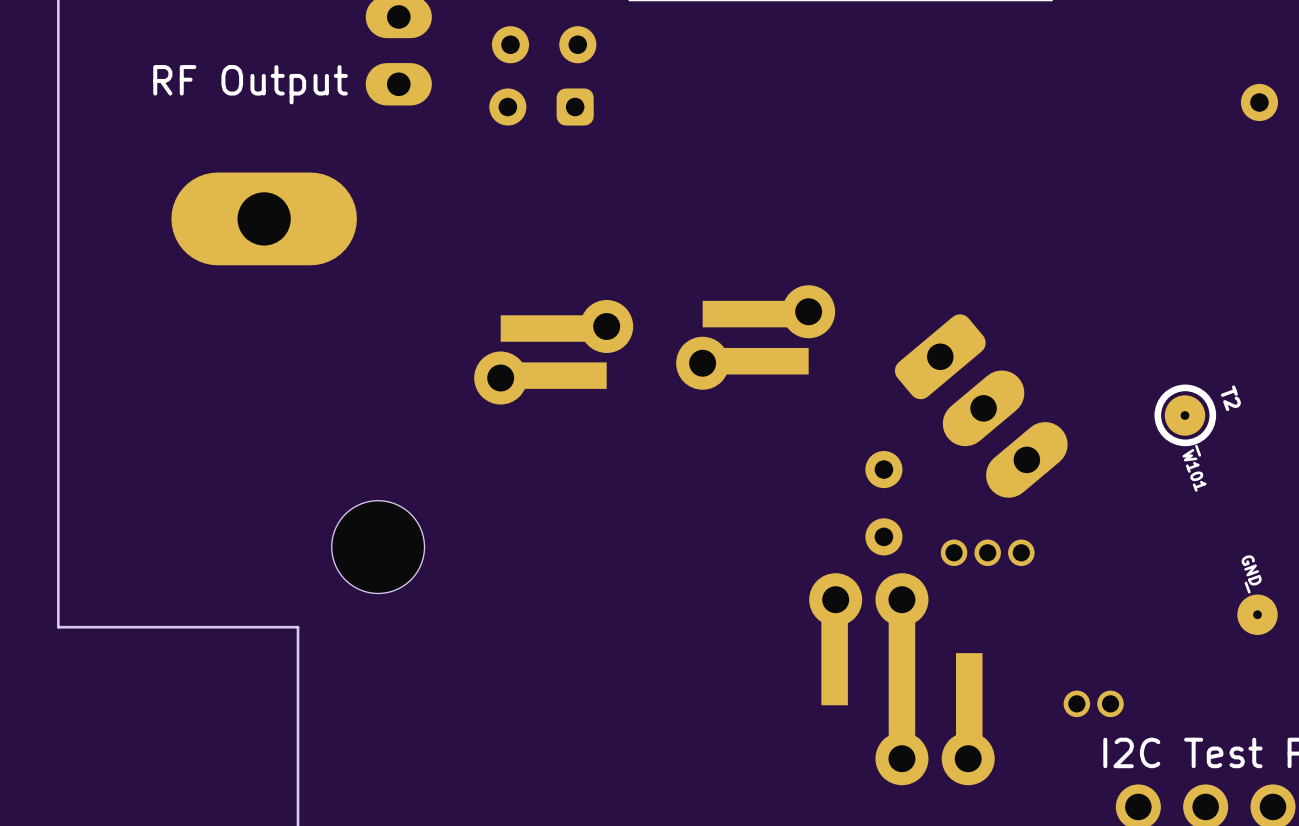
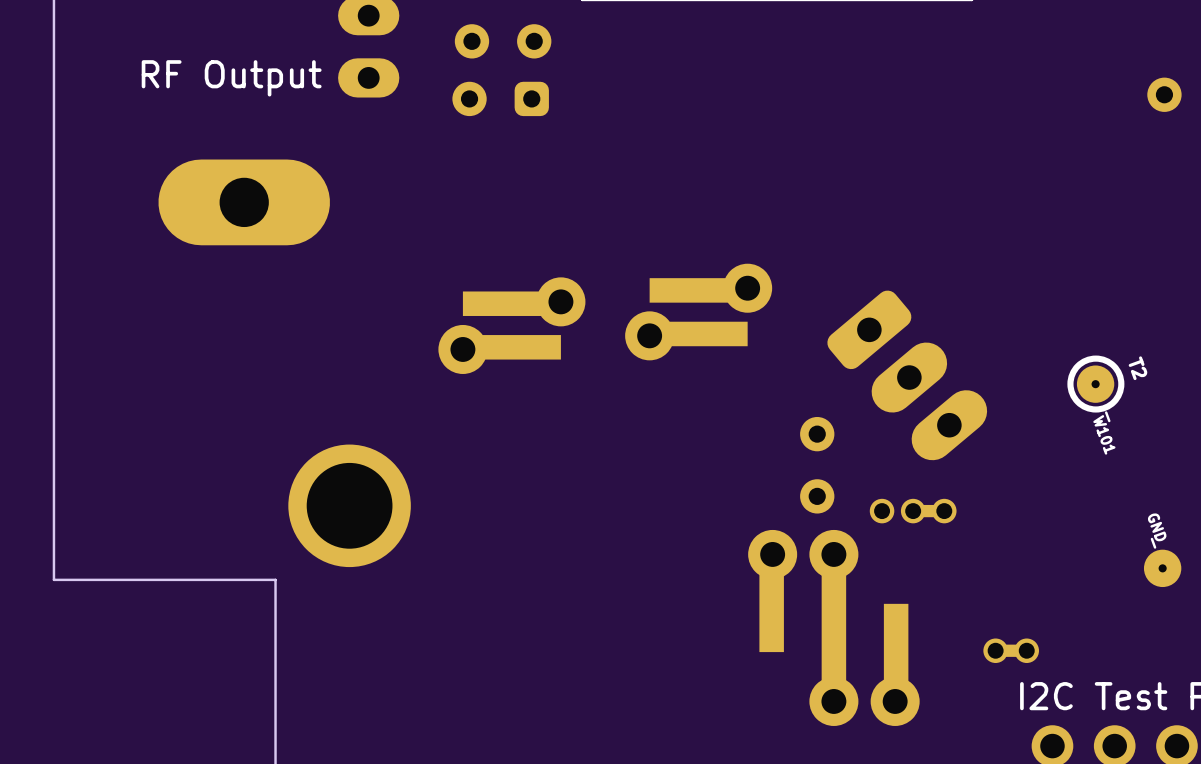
part footprint: [331, 500, 425, 594] -> [288, 444, 411, 568]
part footprint: [940, 539, 1035, 567] -> [869, 498, 957, 524]
part footprint: [1063, 690, 1124, 718] -> [983, 638, 1039, 664]

